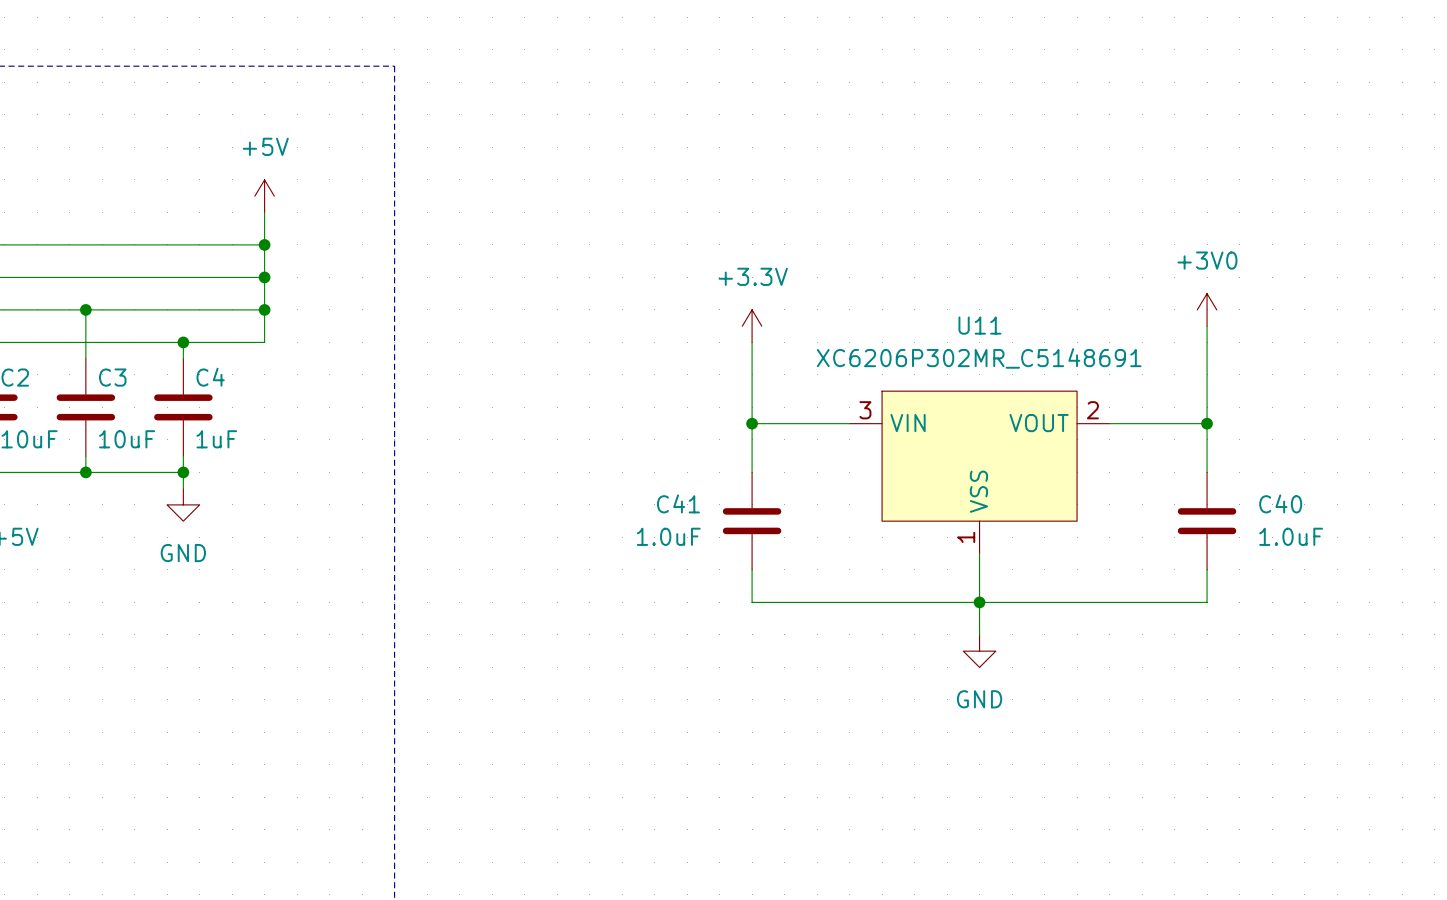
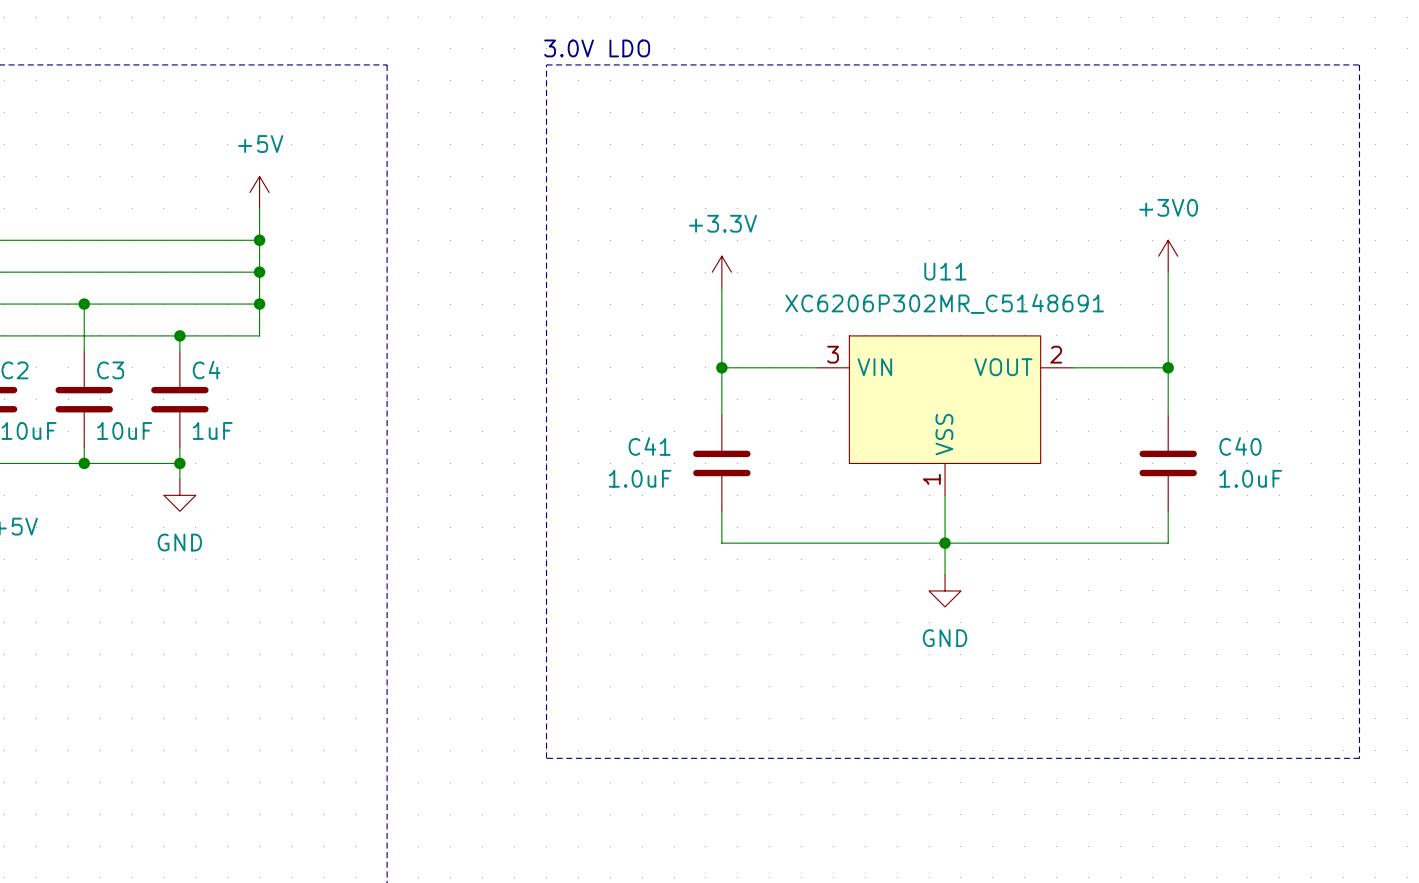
text: none -> 3.0V LDO (597, 48)
line: none -> (546, 64) (1359, 64) (1359, 758) (546, 758) (546, 64)
power symbol position: +3V0 (1207, 309) -> +3V0 (1168, 256)
power symbol position: +3.3V (752, 326) -> +3.3V (721, 272)
wire: (1207, 326) (1207, 472) -> (1168, 272) (1168, 415)
wire: (752, 342) (752, 472) -> (721, 288) (721, 415)
wire: (752, 423) (849, 423) -> (721, 367) (817, 367)
junction position: (752, 423) -> (721, 367)
wire: (1109, 423) (1207, 423) -> (1072, 367) (1168, 367)
junction position: (1207, 423) -> (1168, 367)
U11 position: (979, 472) -> (945, 415)
C41 position: (752, 521) -> (721, 463)
C40 position: (1207, 521) -> (1168, 463)
wire: (979, 553) (979, 634) -> (945, 495) (945, 575)
wire: (752, 569) (752, 602) (1207, 602) (1207, 569) -> (721, 511) (721, 543) (1168, 543) (1168, 511)
junction position: (979, 602) -> (945, 543)
power symbol position: GND (979, 651) -> GND (945, 590)

